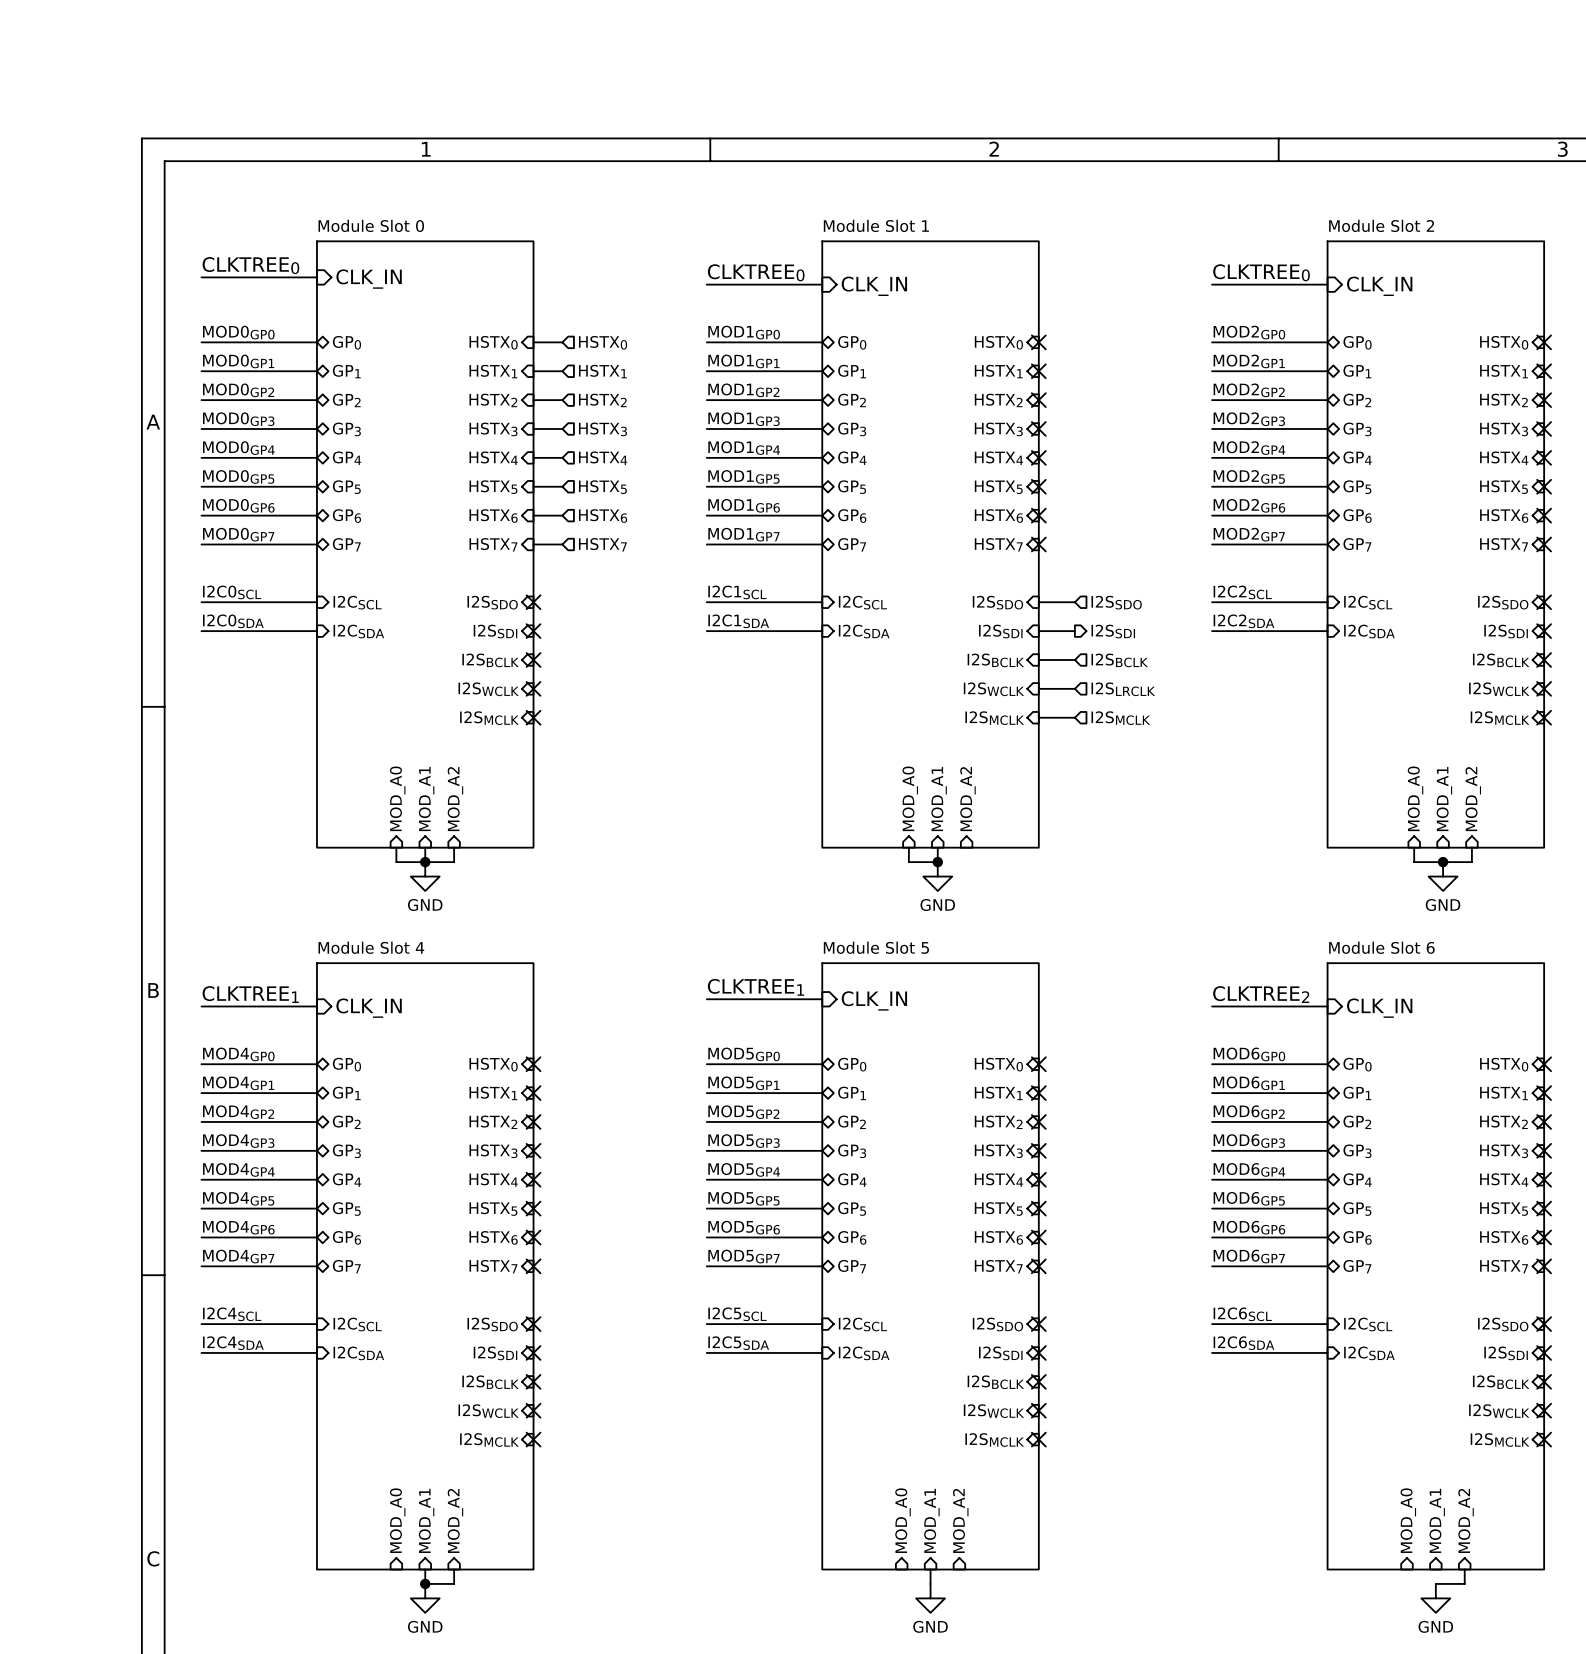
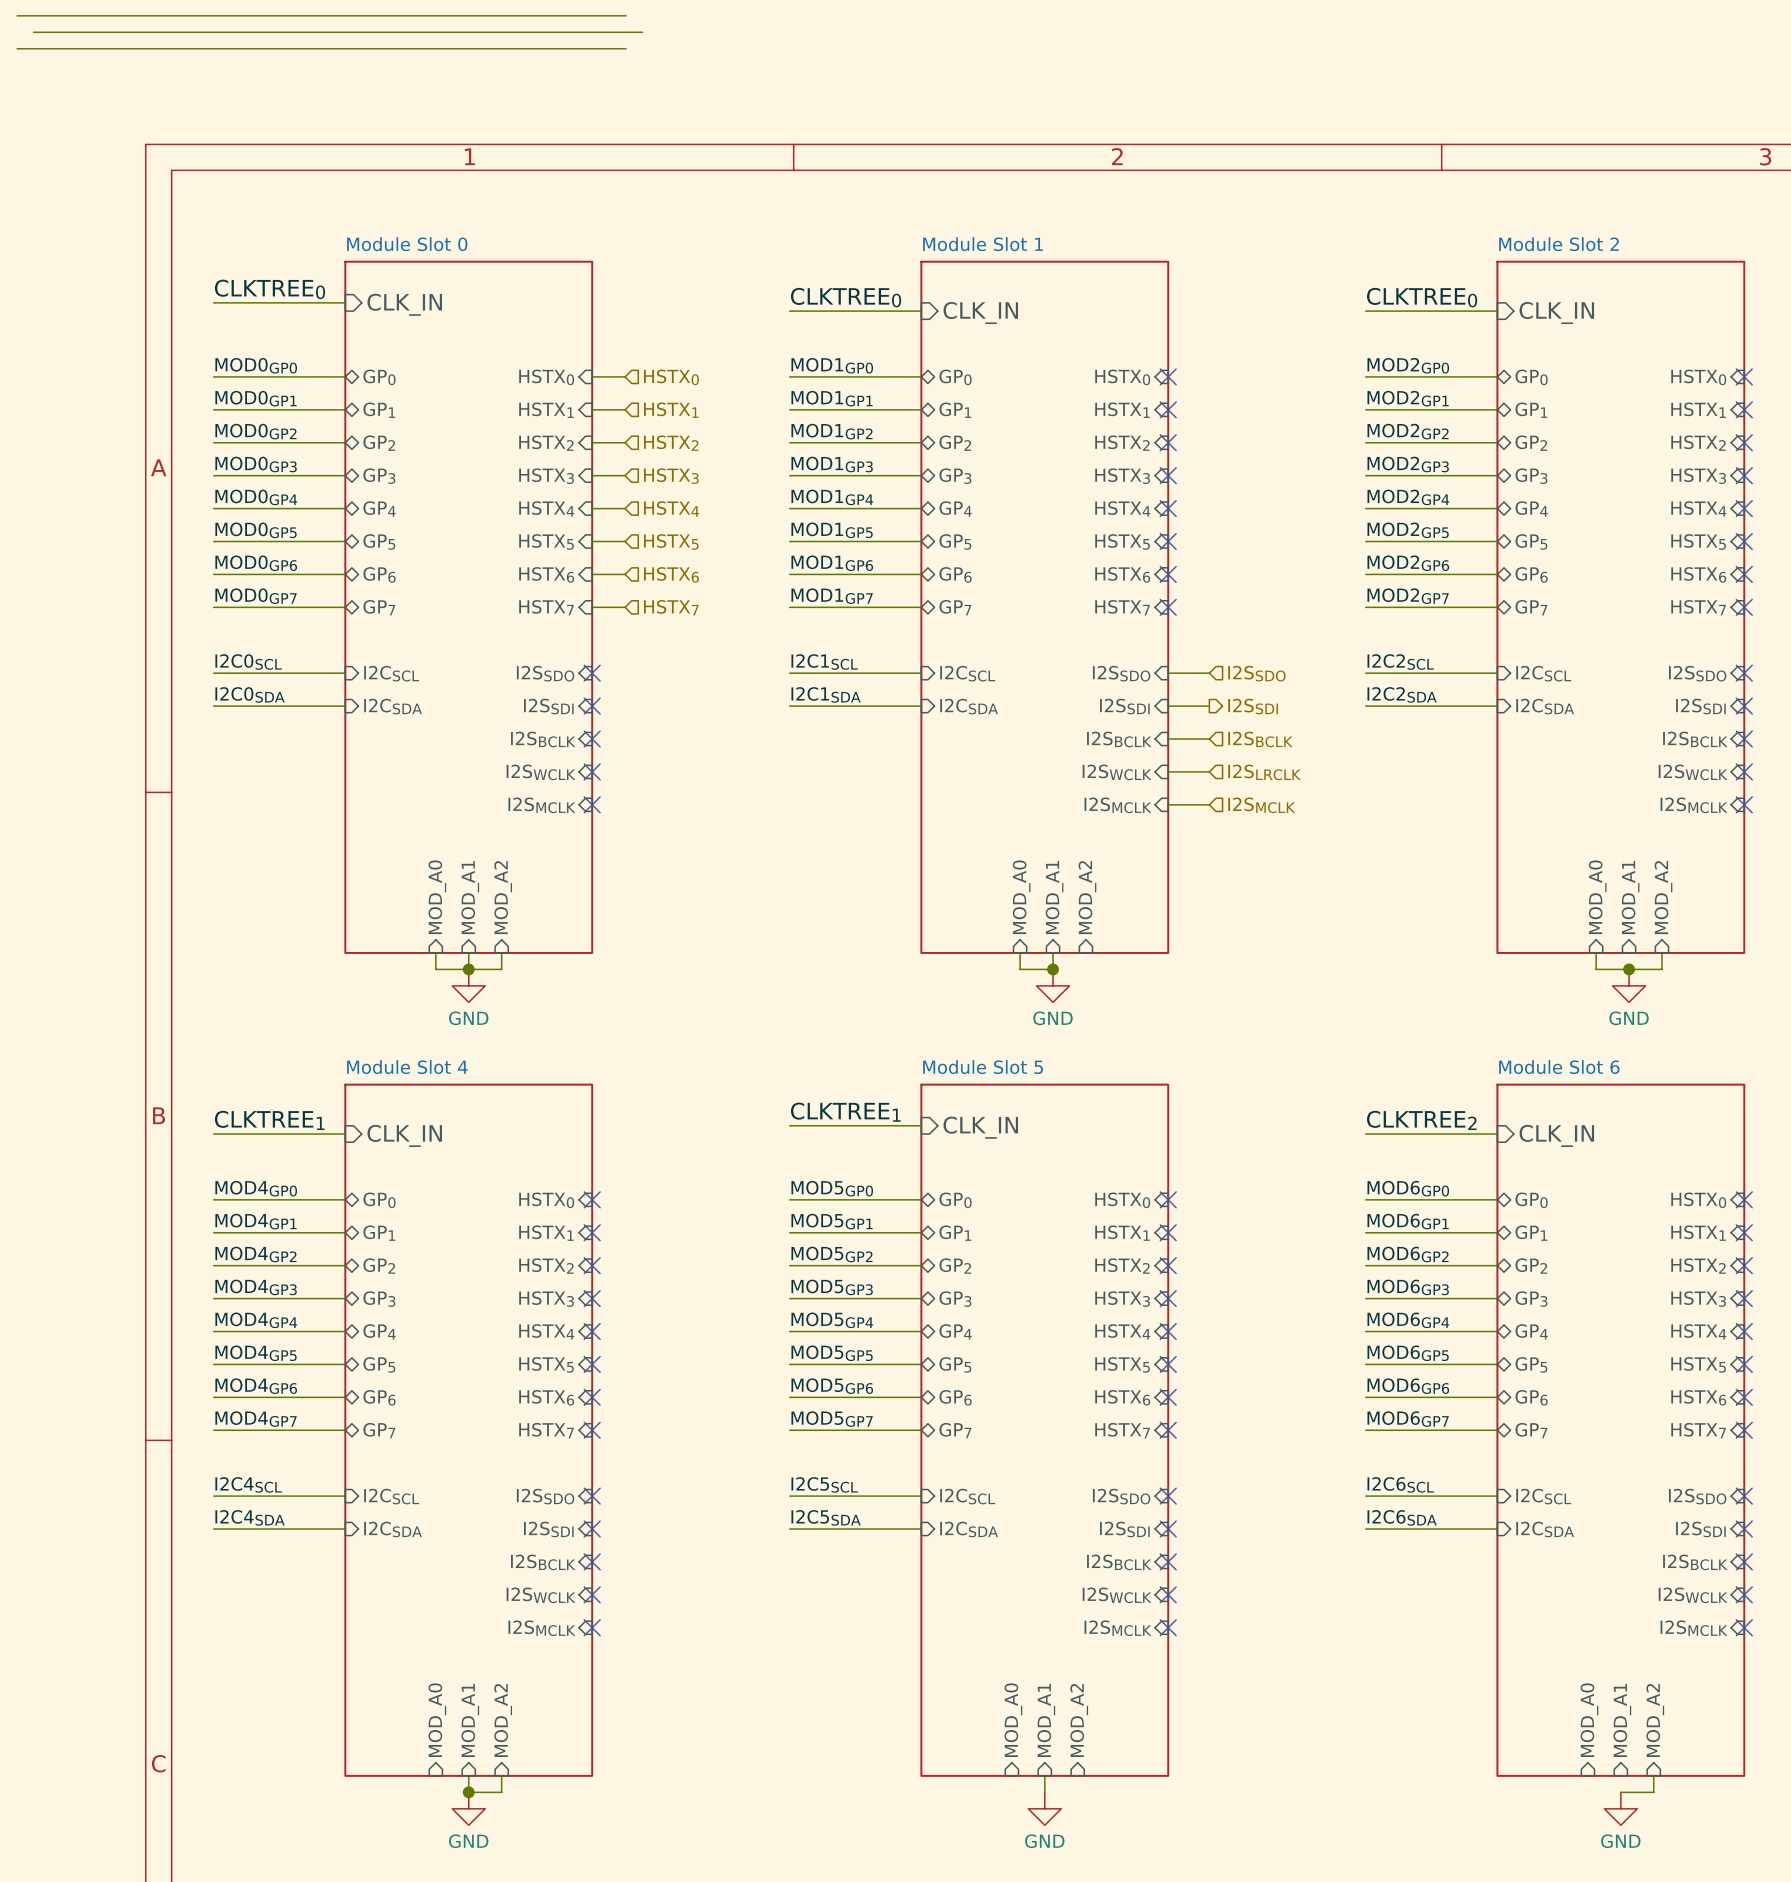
wire: none -> (17, 15) (626, 15)
wire: none -> (33, 32) (642, 32)
wire: none -> (17, 48) (626, 48)

